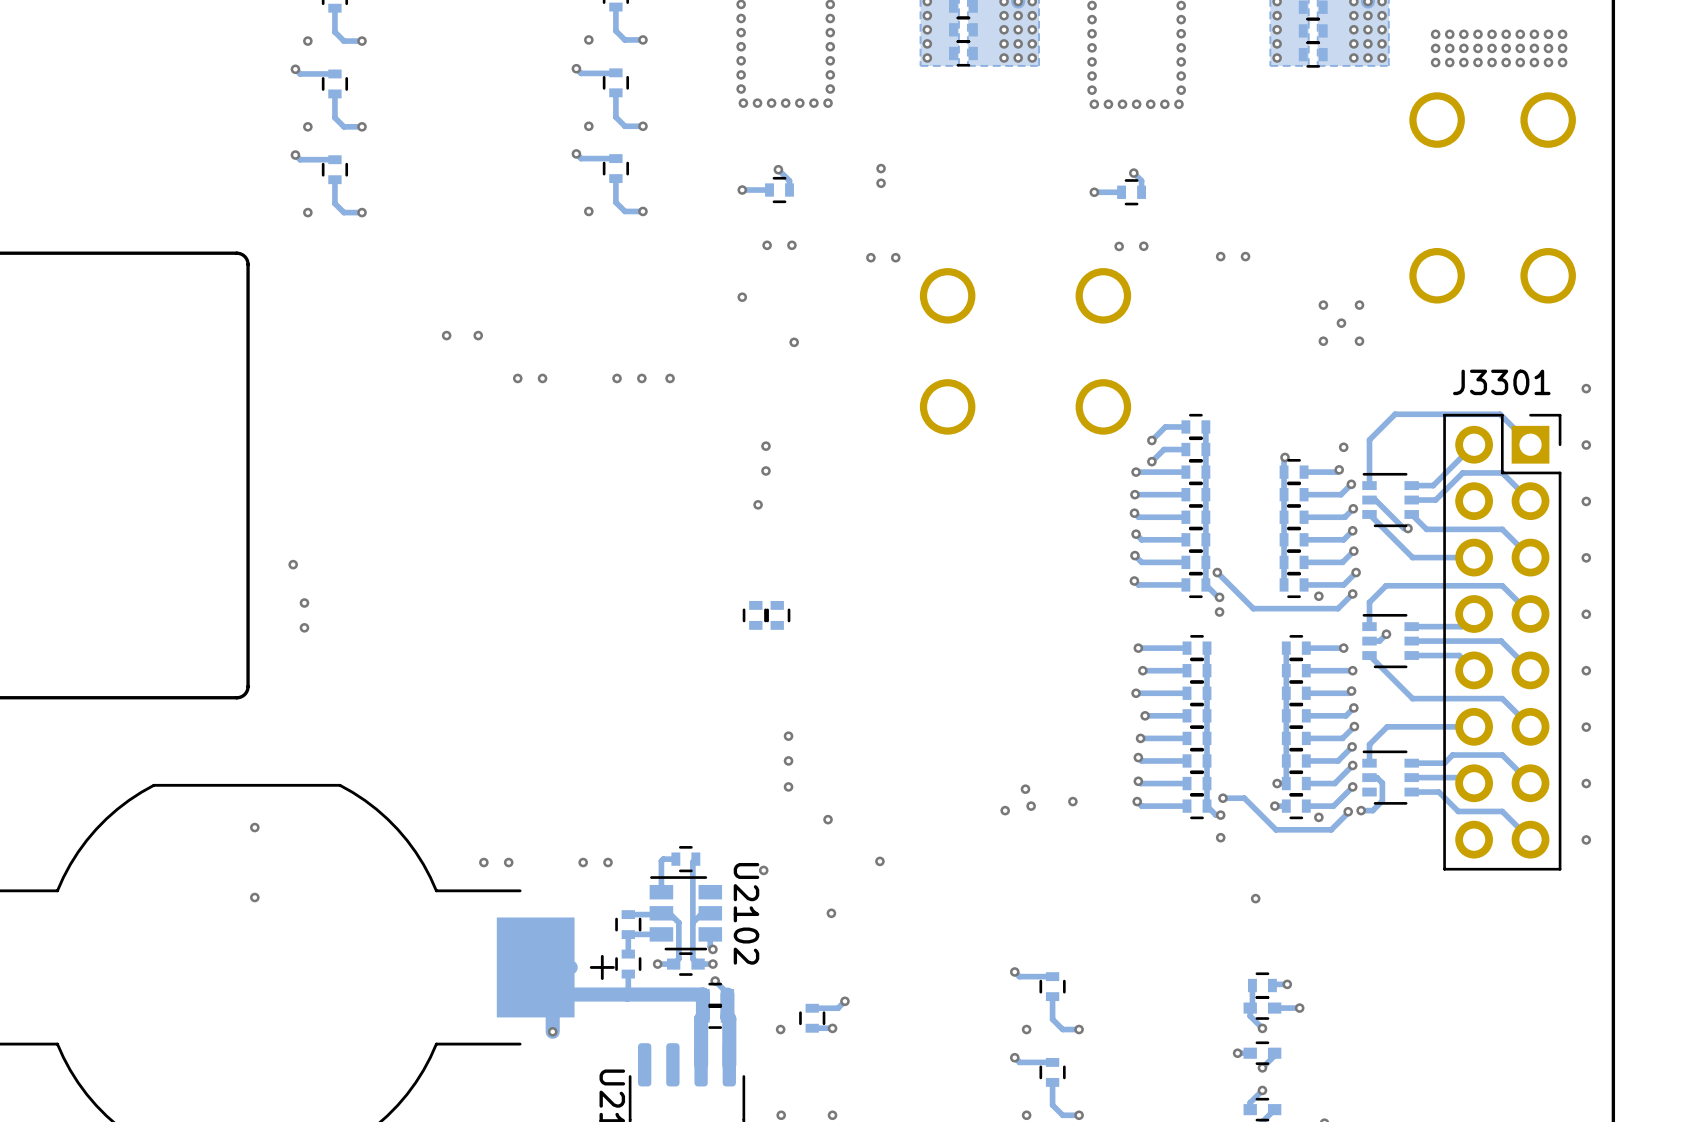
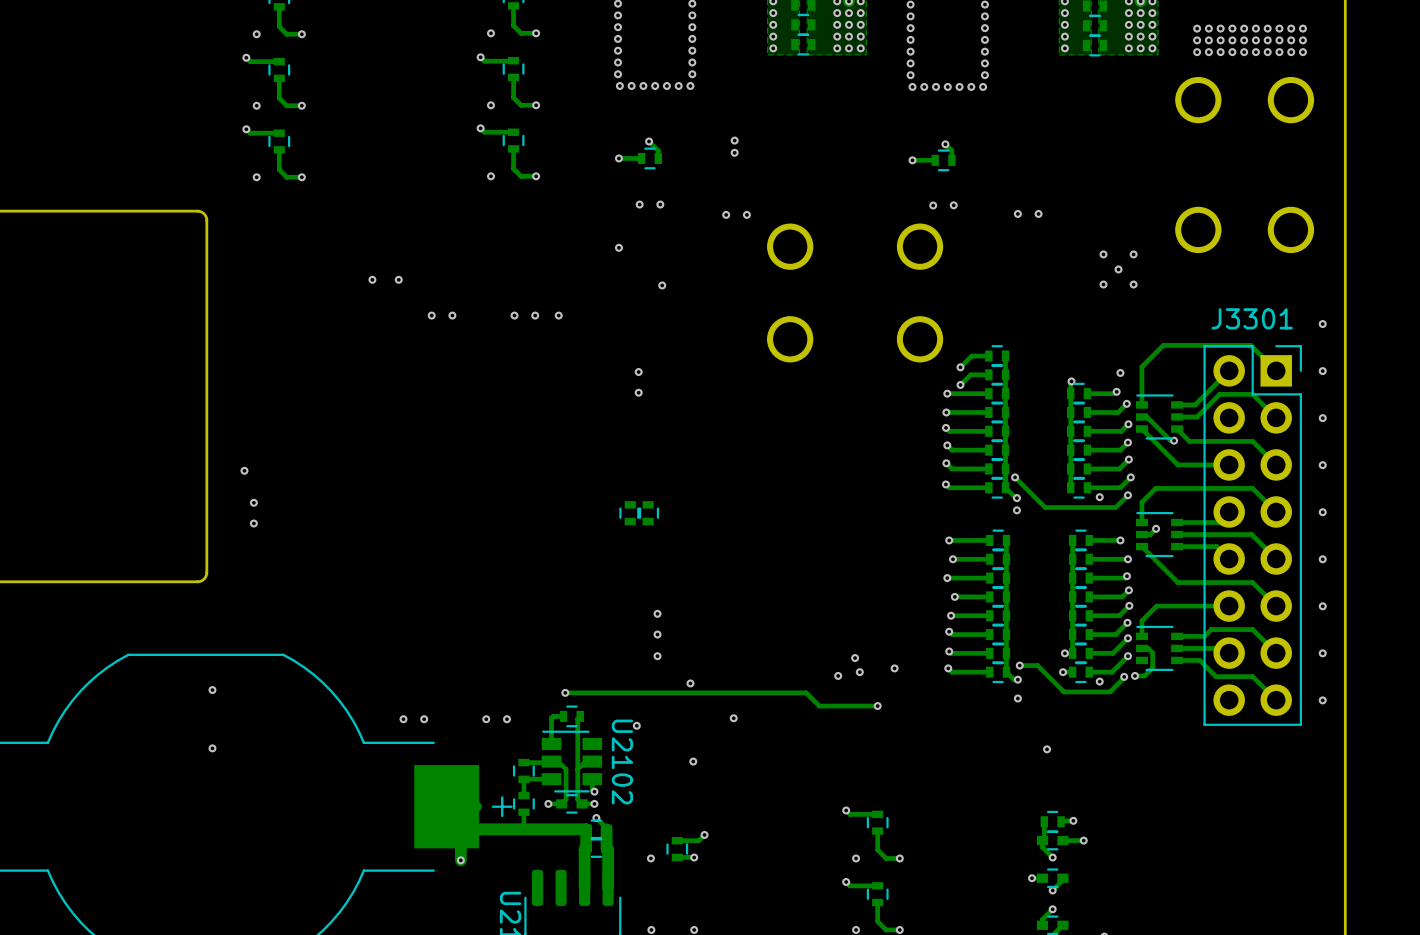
via: (758, 504) -> none
track: none -> (565, 692) (806, 692) (819, 706) (877, 706)
via: none -> (565, 692)
via: none -> (877, 706)

